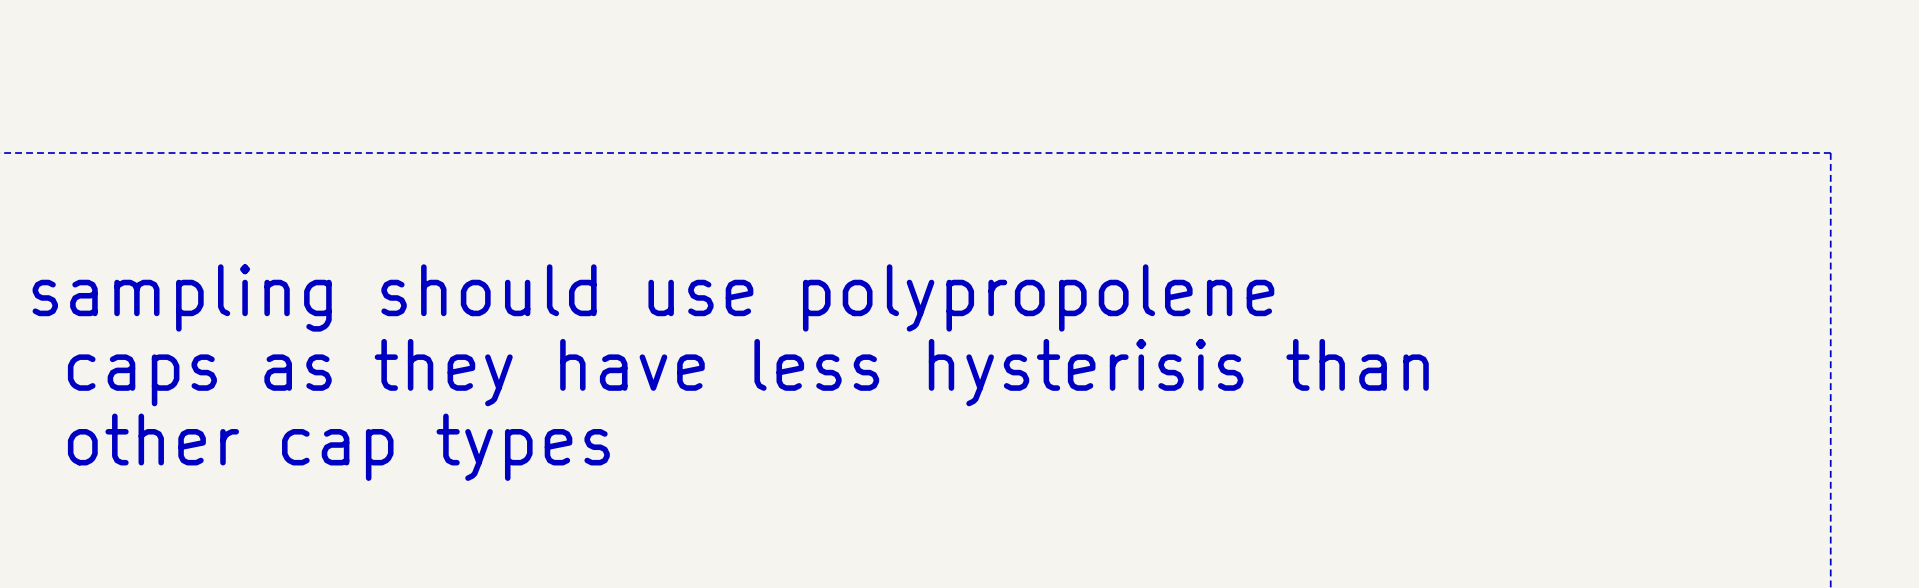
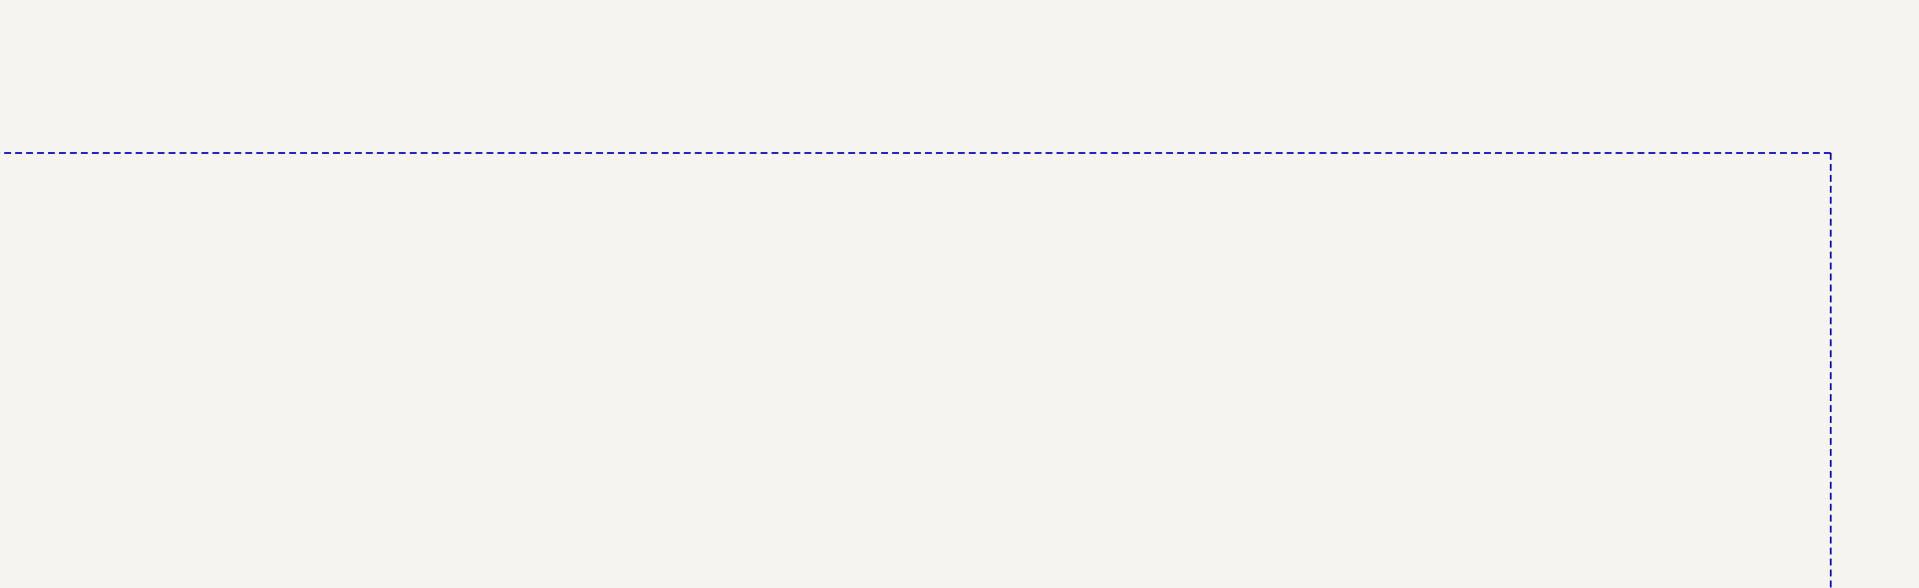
text: sampling should use polypropolene (653, 297) -> none
text: caps as they have less hysterisis than (748, 372) -> none
text: other cap types (338, 447) -> none

